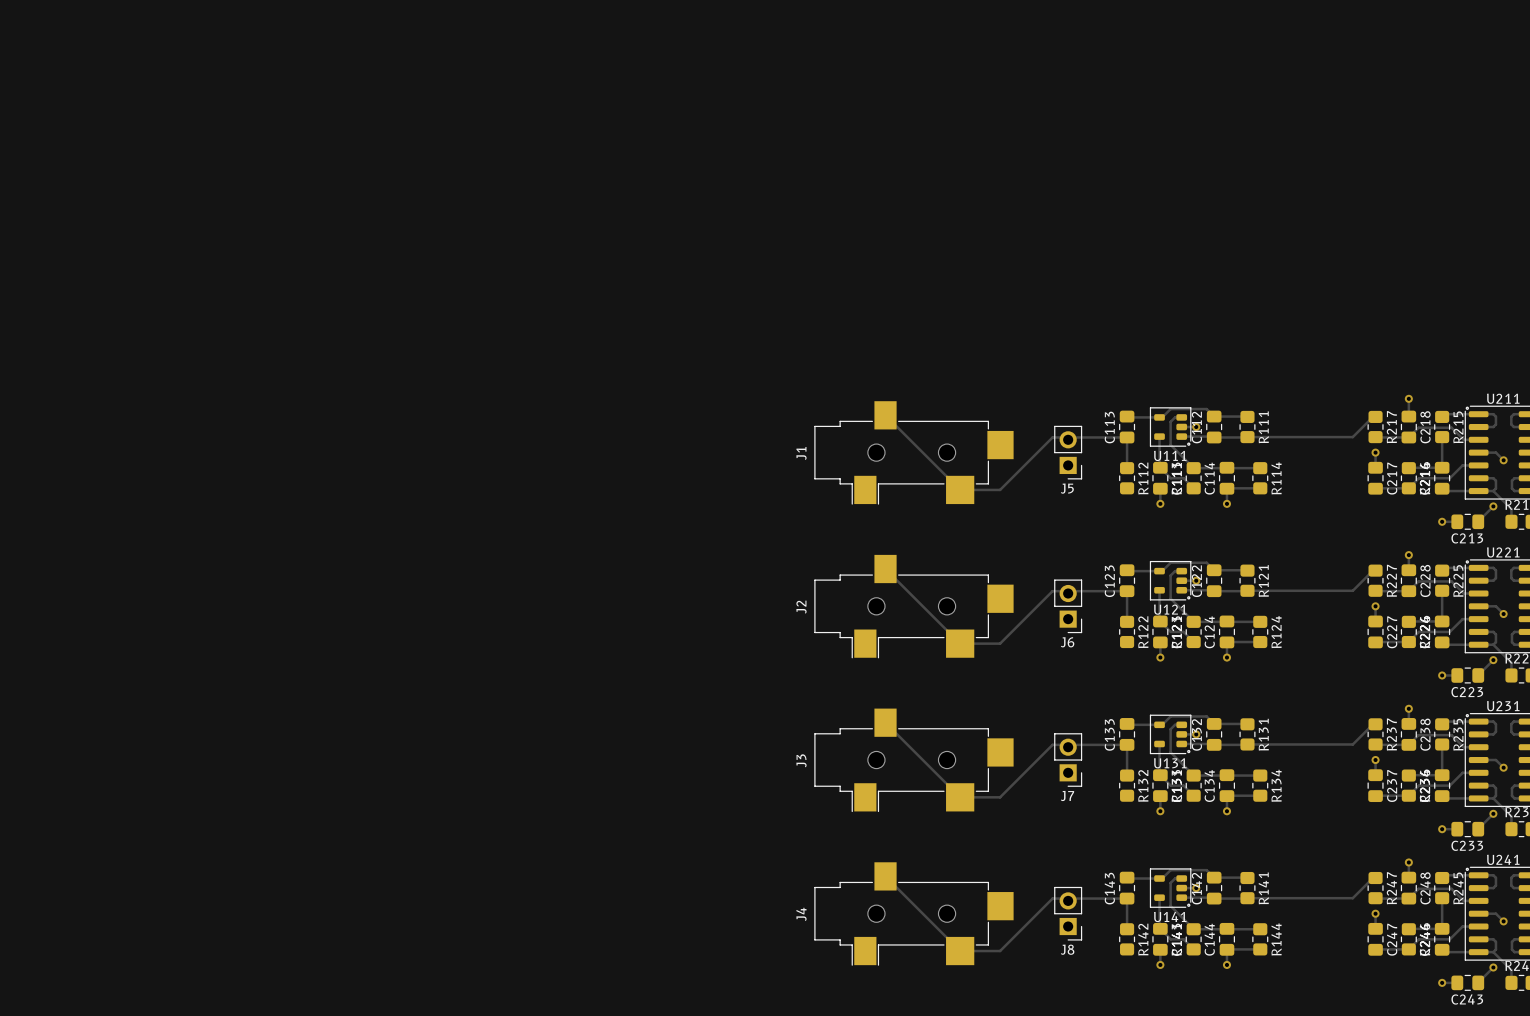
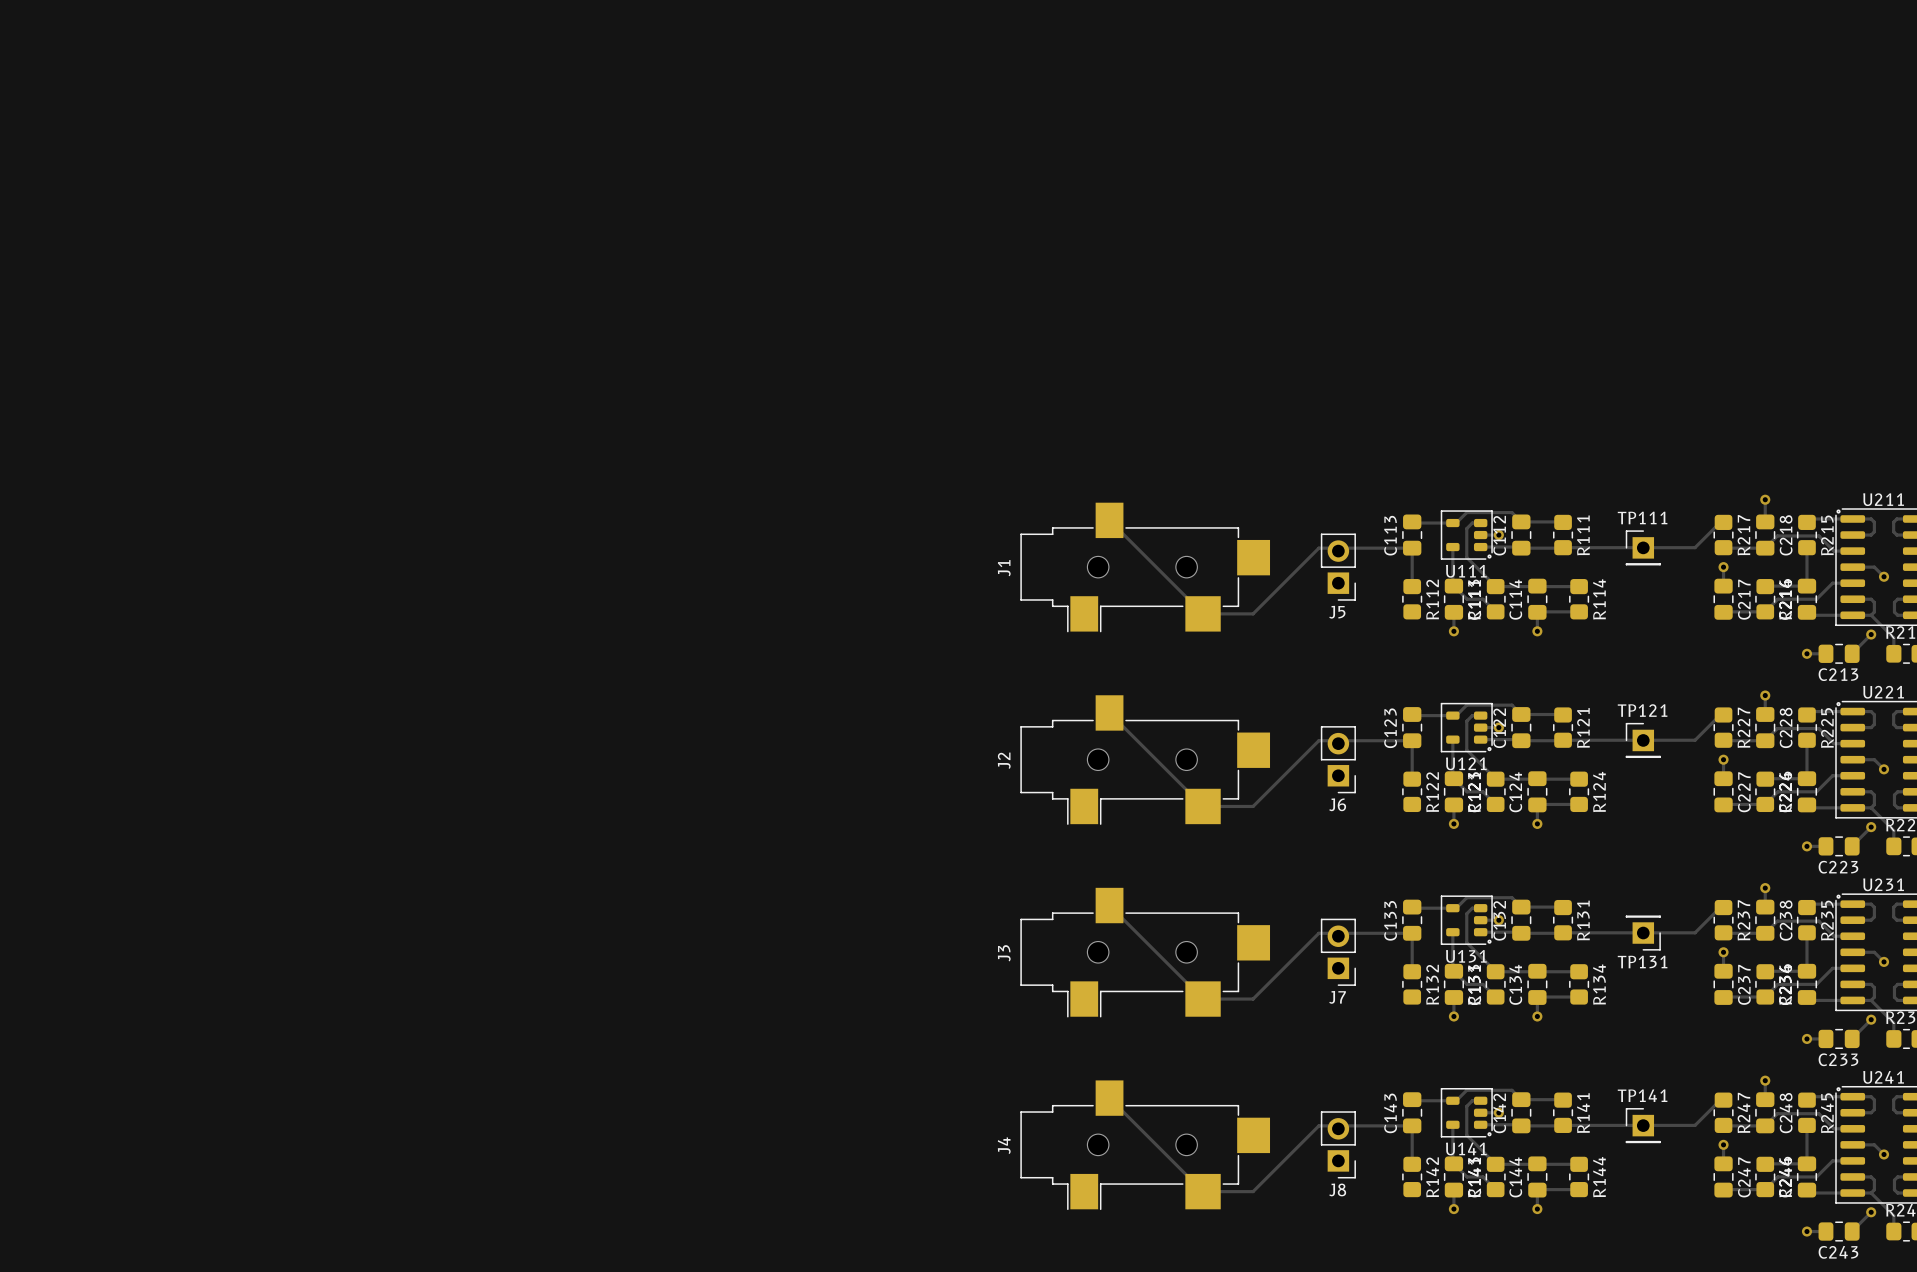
TP111: none -> (1643, 547)
TP121: none -> (1643, 740)
TP131: none -> (1643, 933)
TP141: none -> (1643, 1125)

